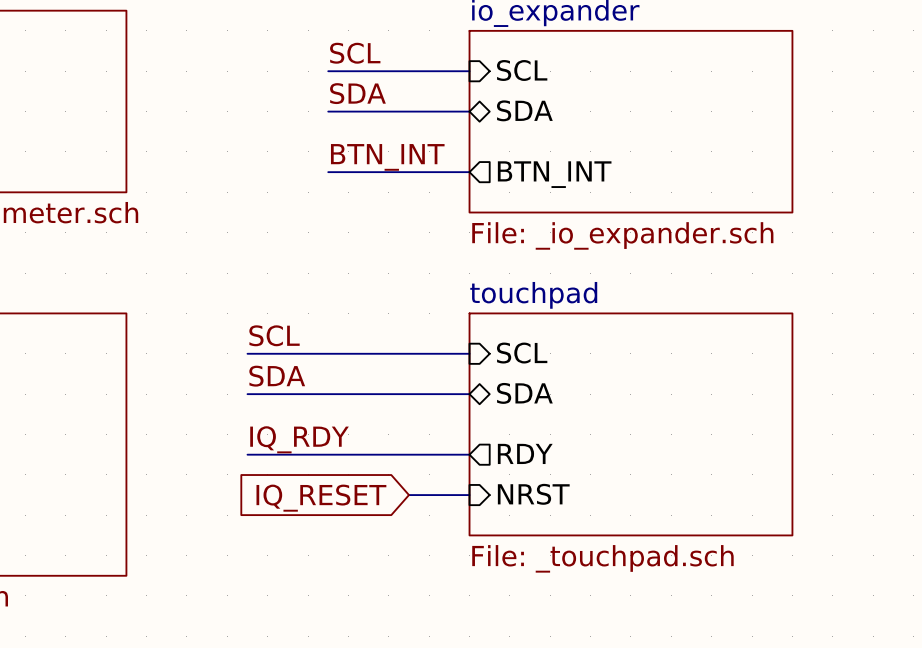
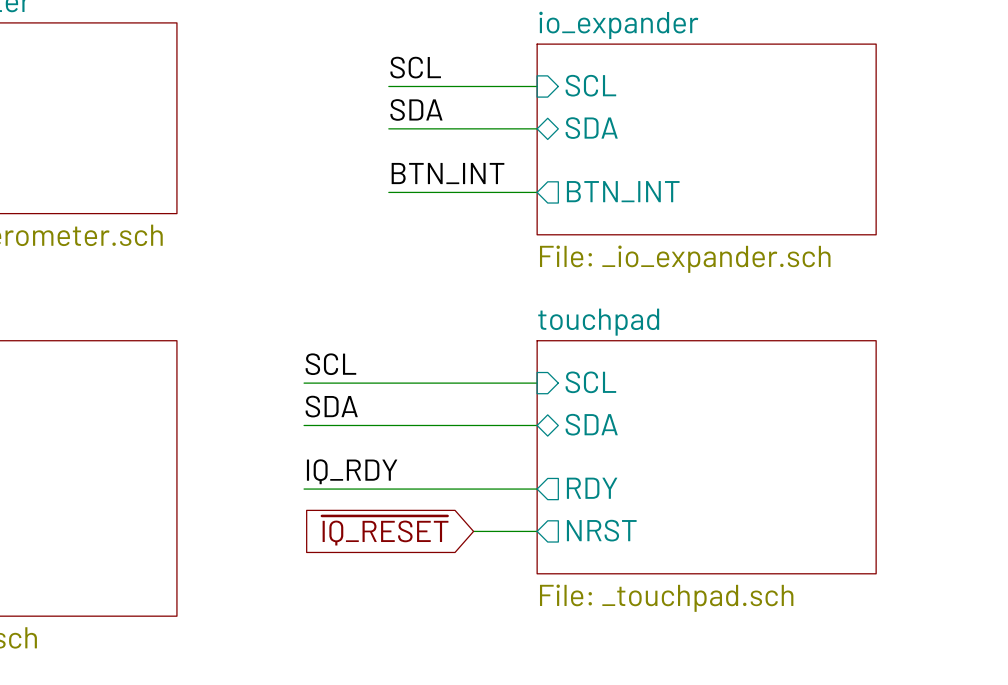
sheet pin shape: input (533, 494) -> output (601, 530)
global label: IQ_RESET (321, 498) -> ~{IQ_RESET} (385, 530)

